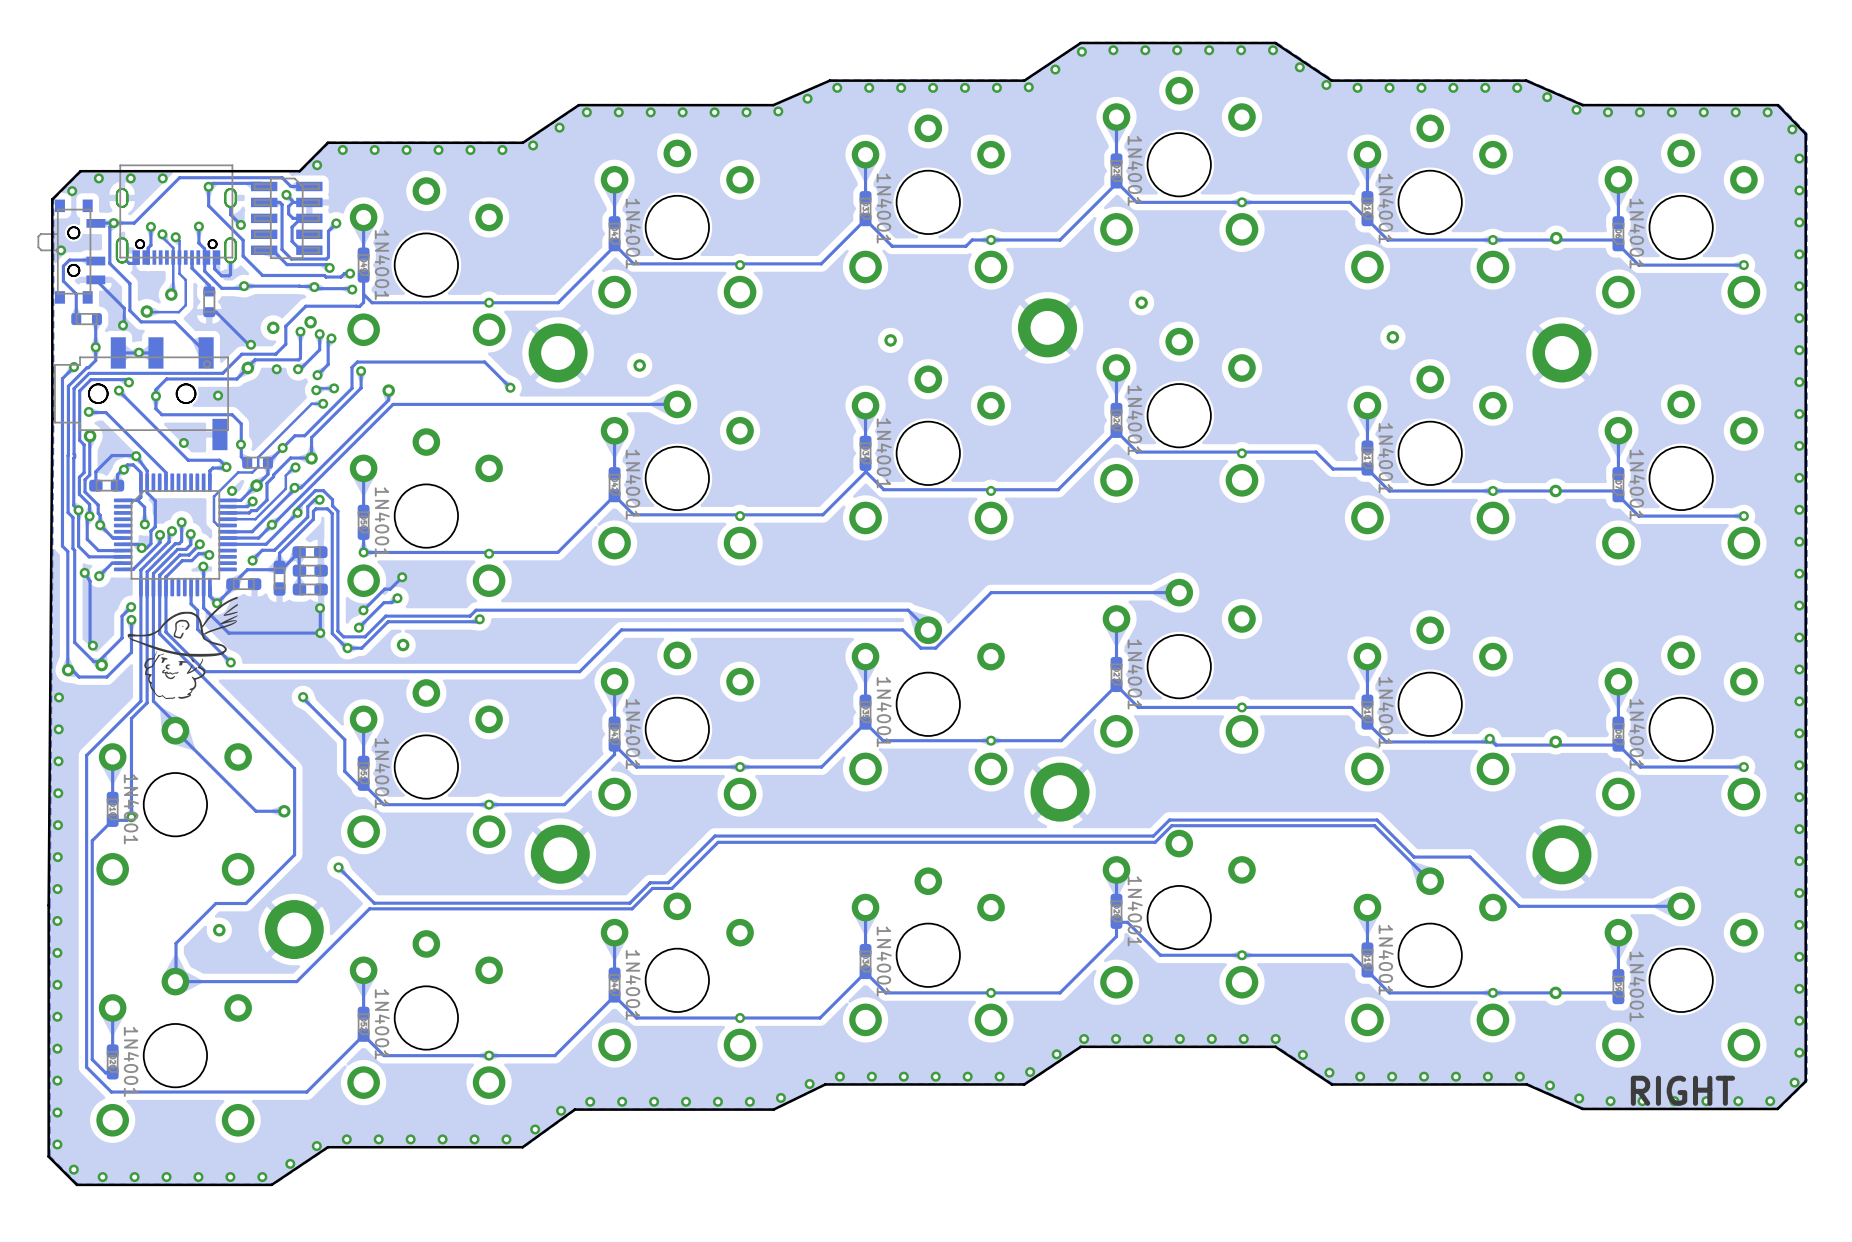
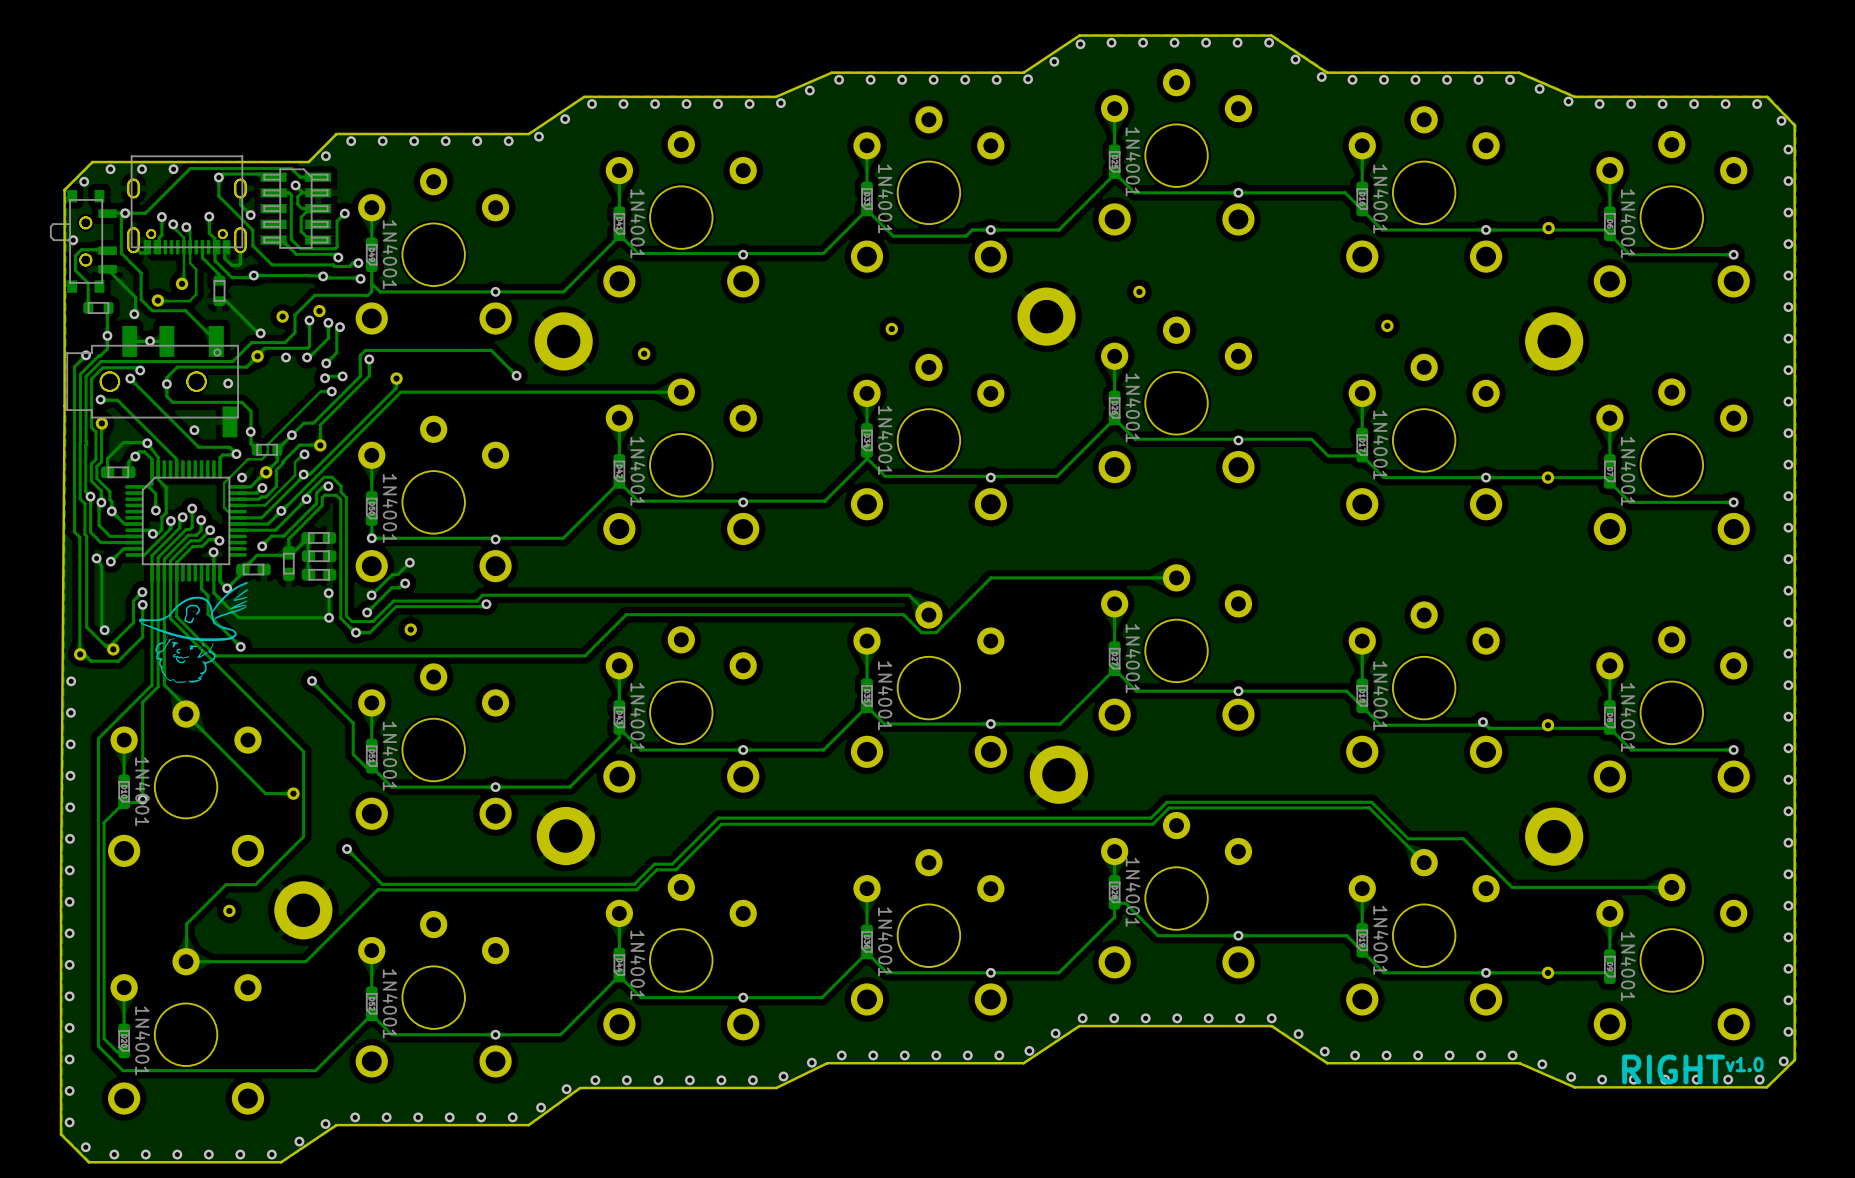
text: none -> v1.0 (1744, 1064)

